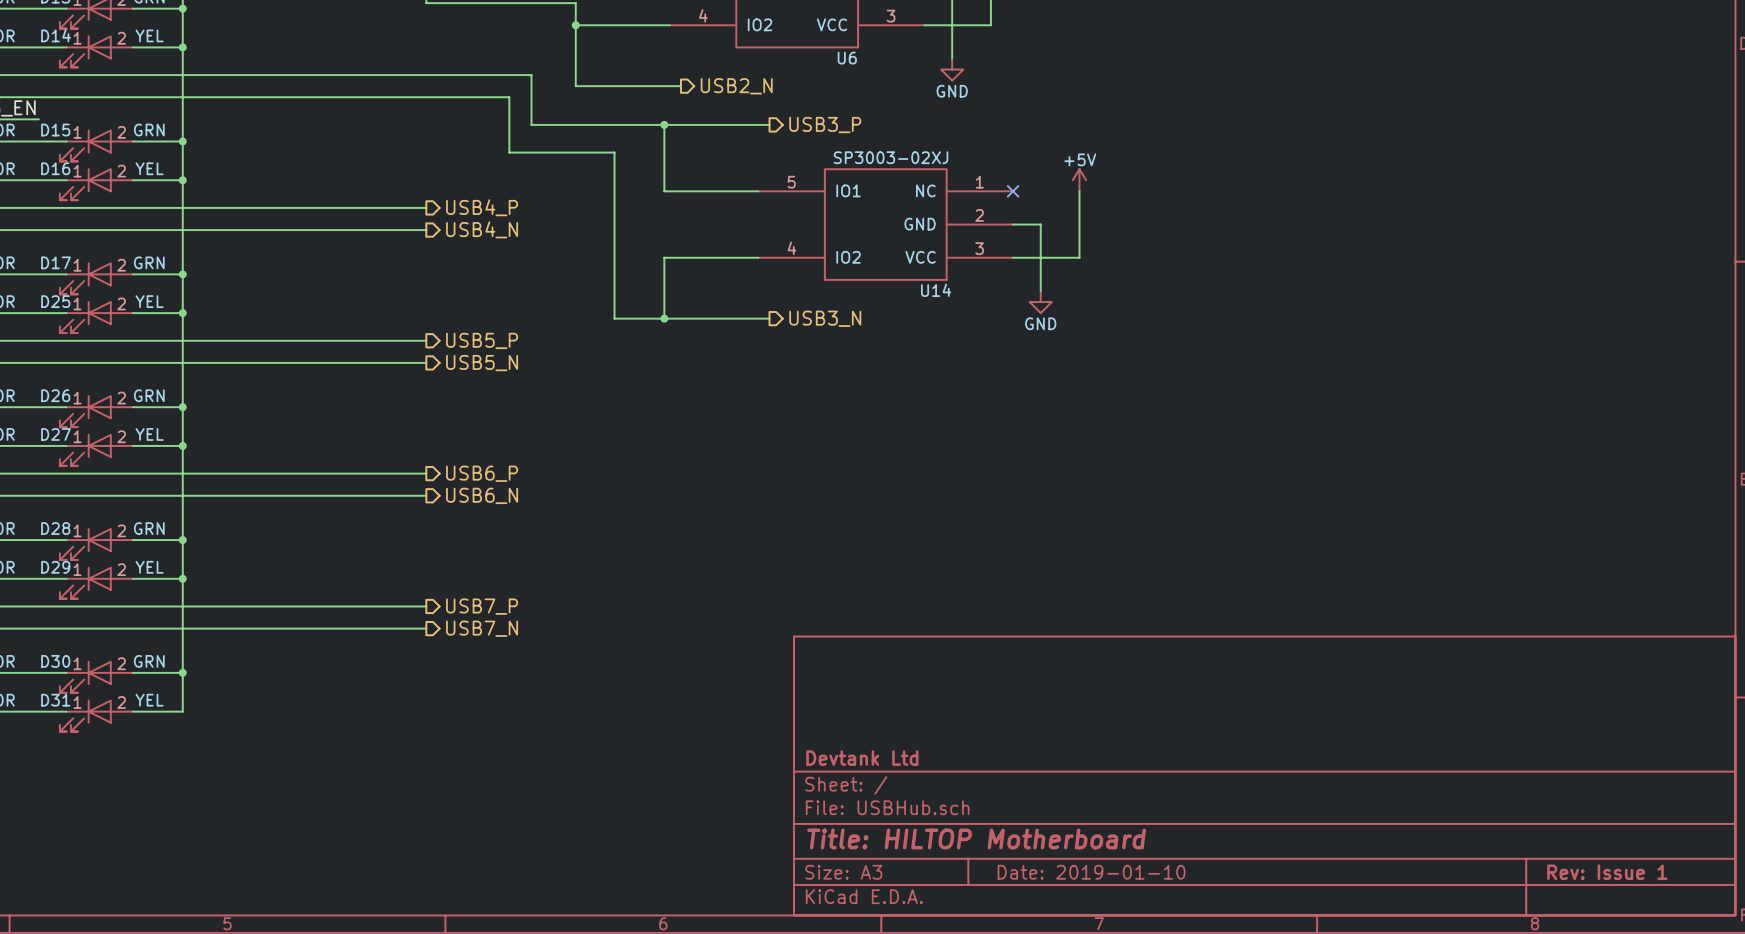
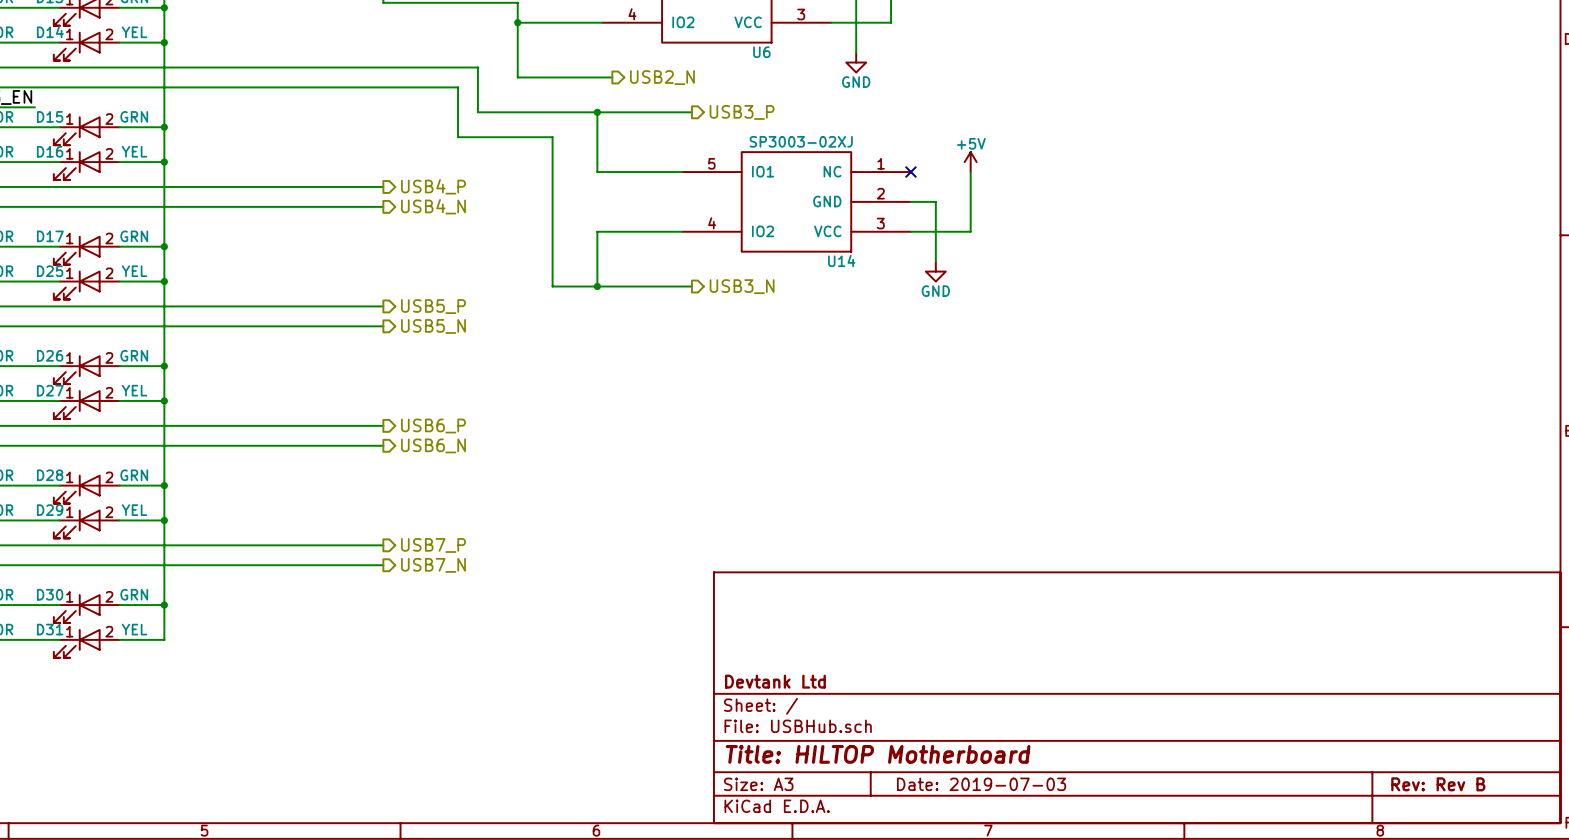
title block: Date: 2019-01-10 (1091, 872) -> Date: 2019-07-03 (981, 784)
title block: Rev: Issue 1 (1607, 872) -> Rev: Rev B (1438, 784)

